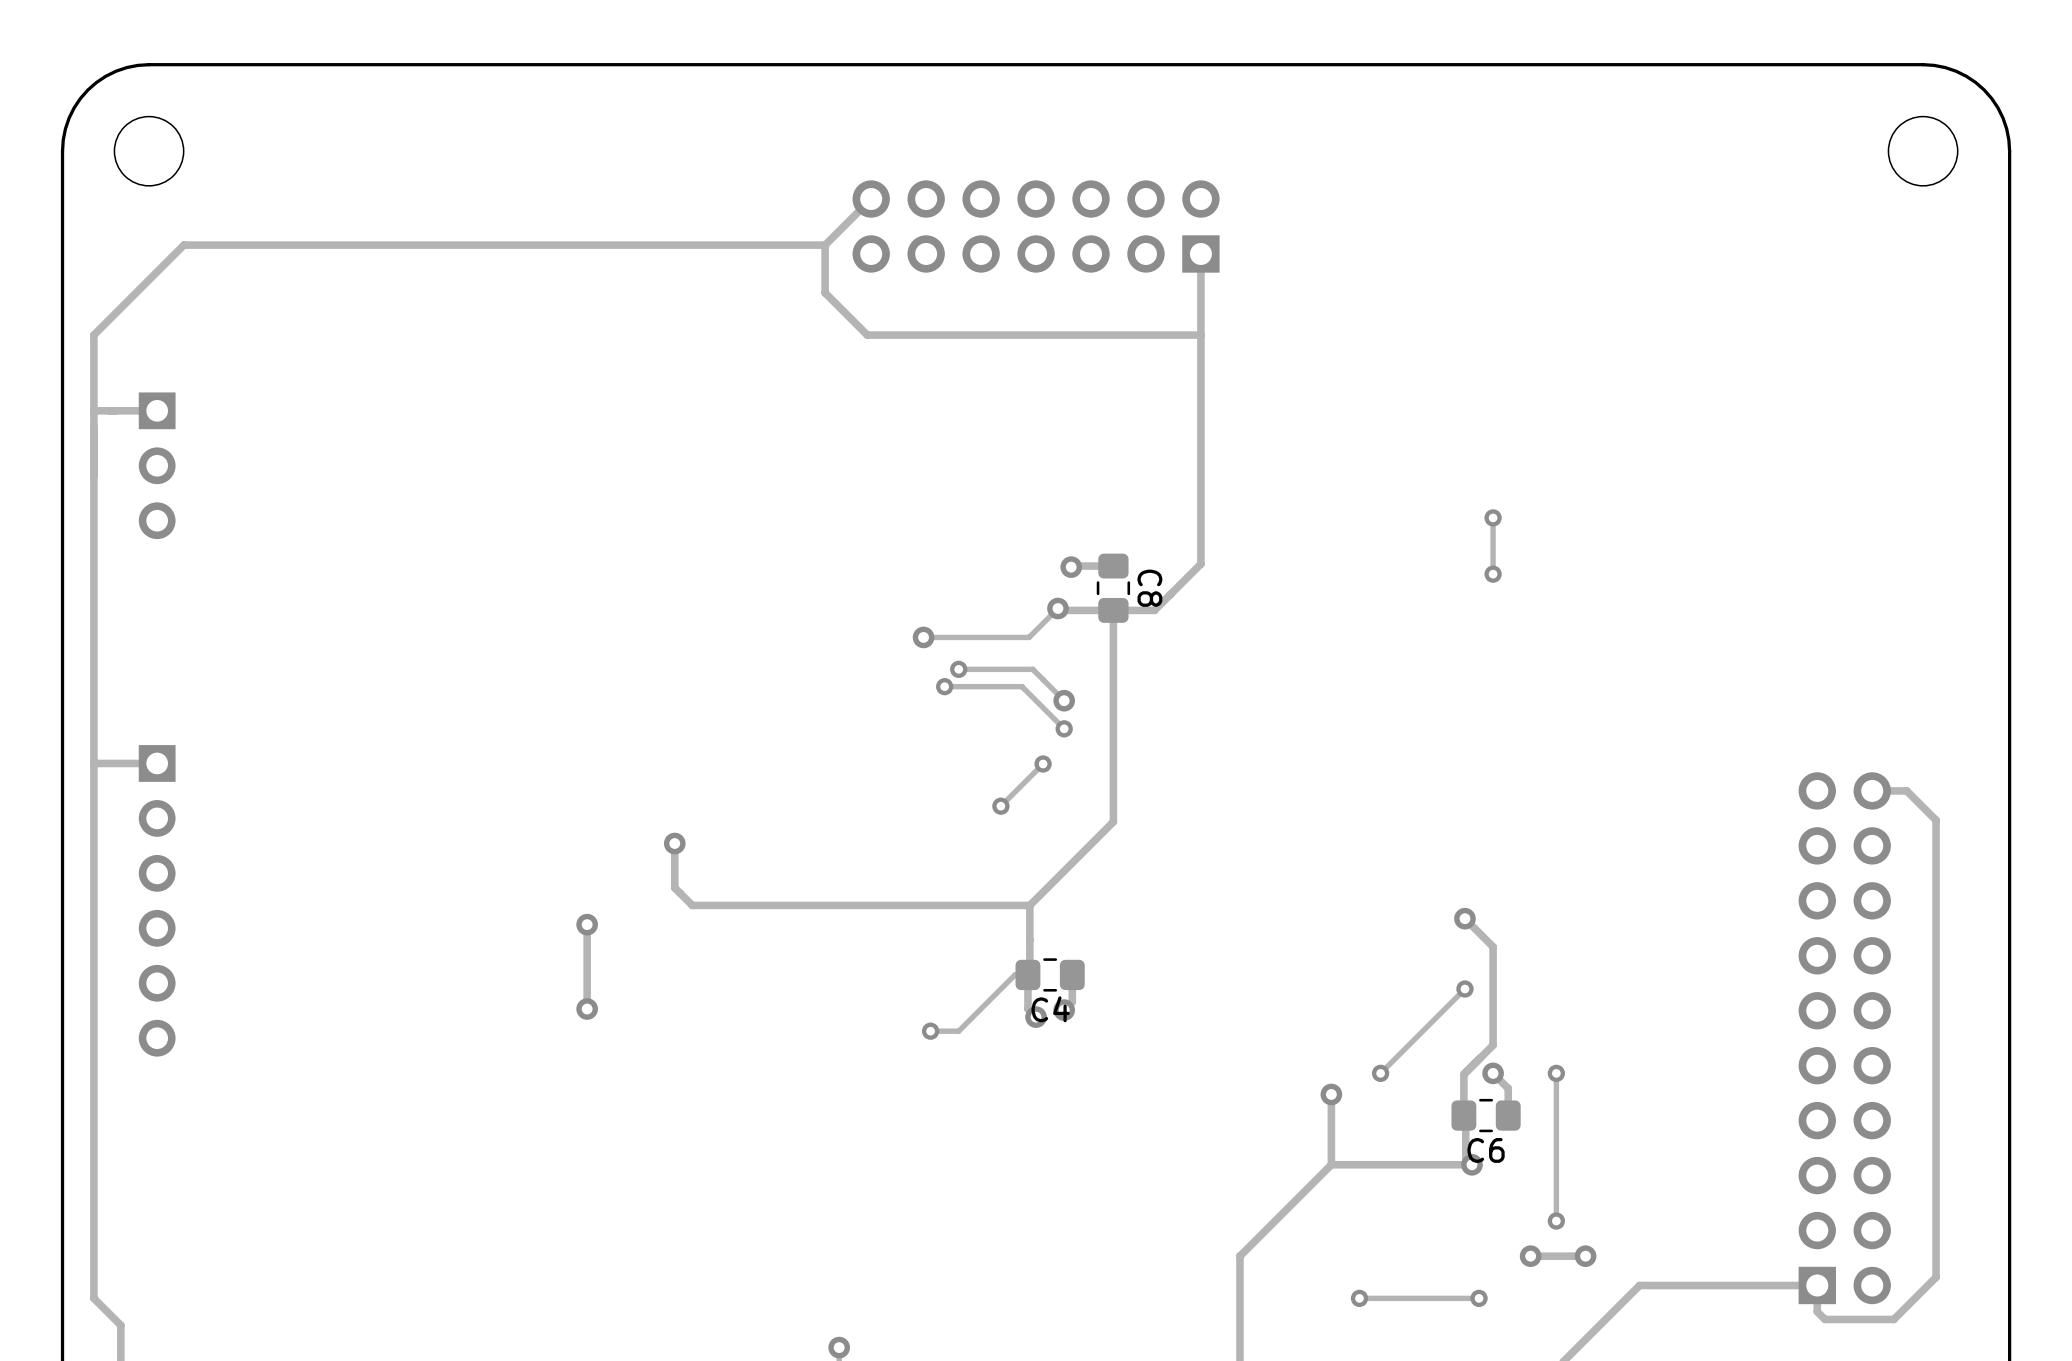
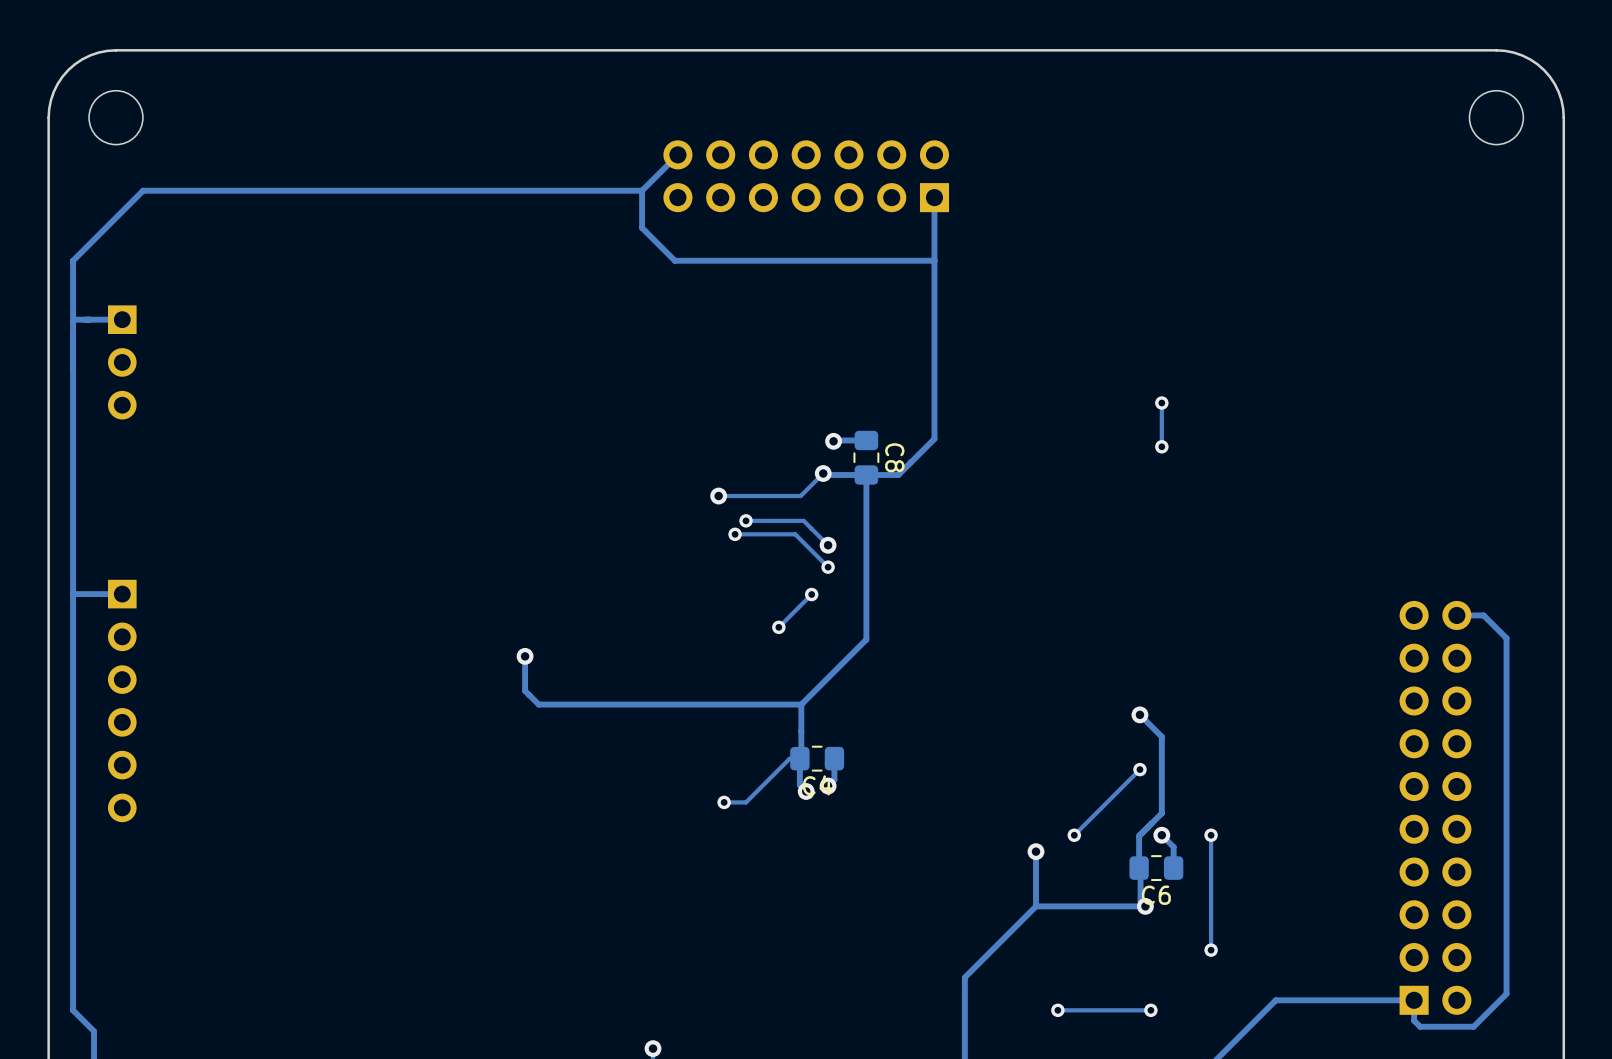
track: (587, 924) (587, 1009) -> none
via: (587, 924) -> none
via: (587, 1009) -> none
via: (1530, 1256) -> none
track: (1585, 1256) (1530, 1256) -> none
via: (1585, 1256) -> none

